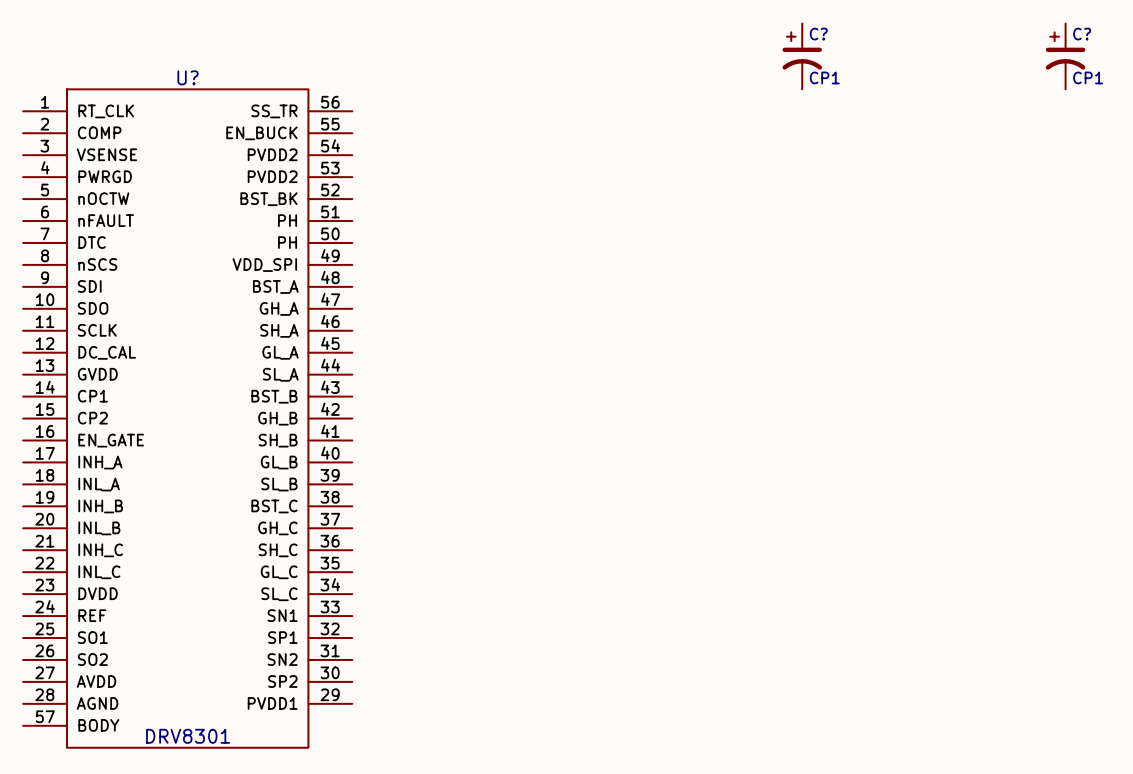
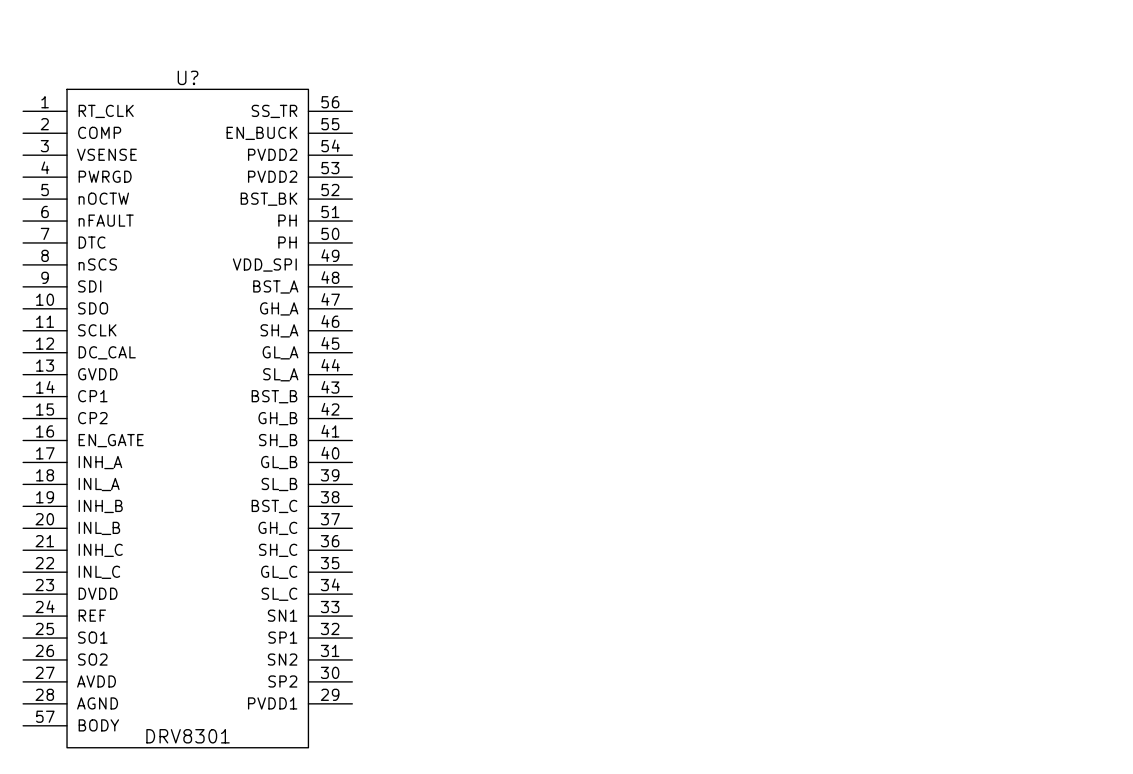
C?: CP1 (802, 56) -> none
C?: CP1 (1065, 56) -> none

